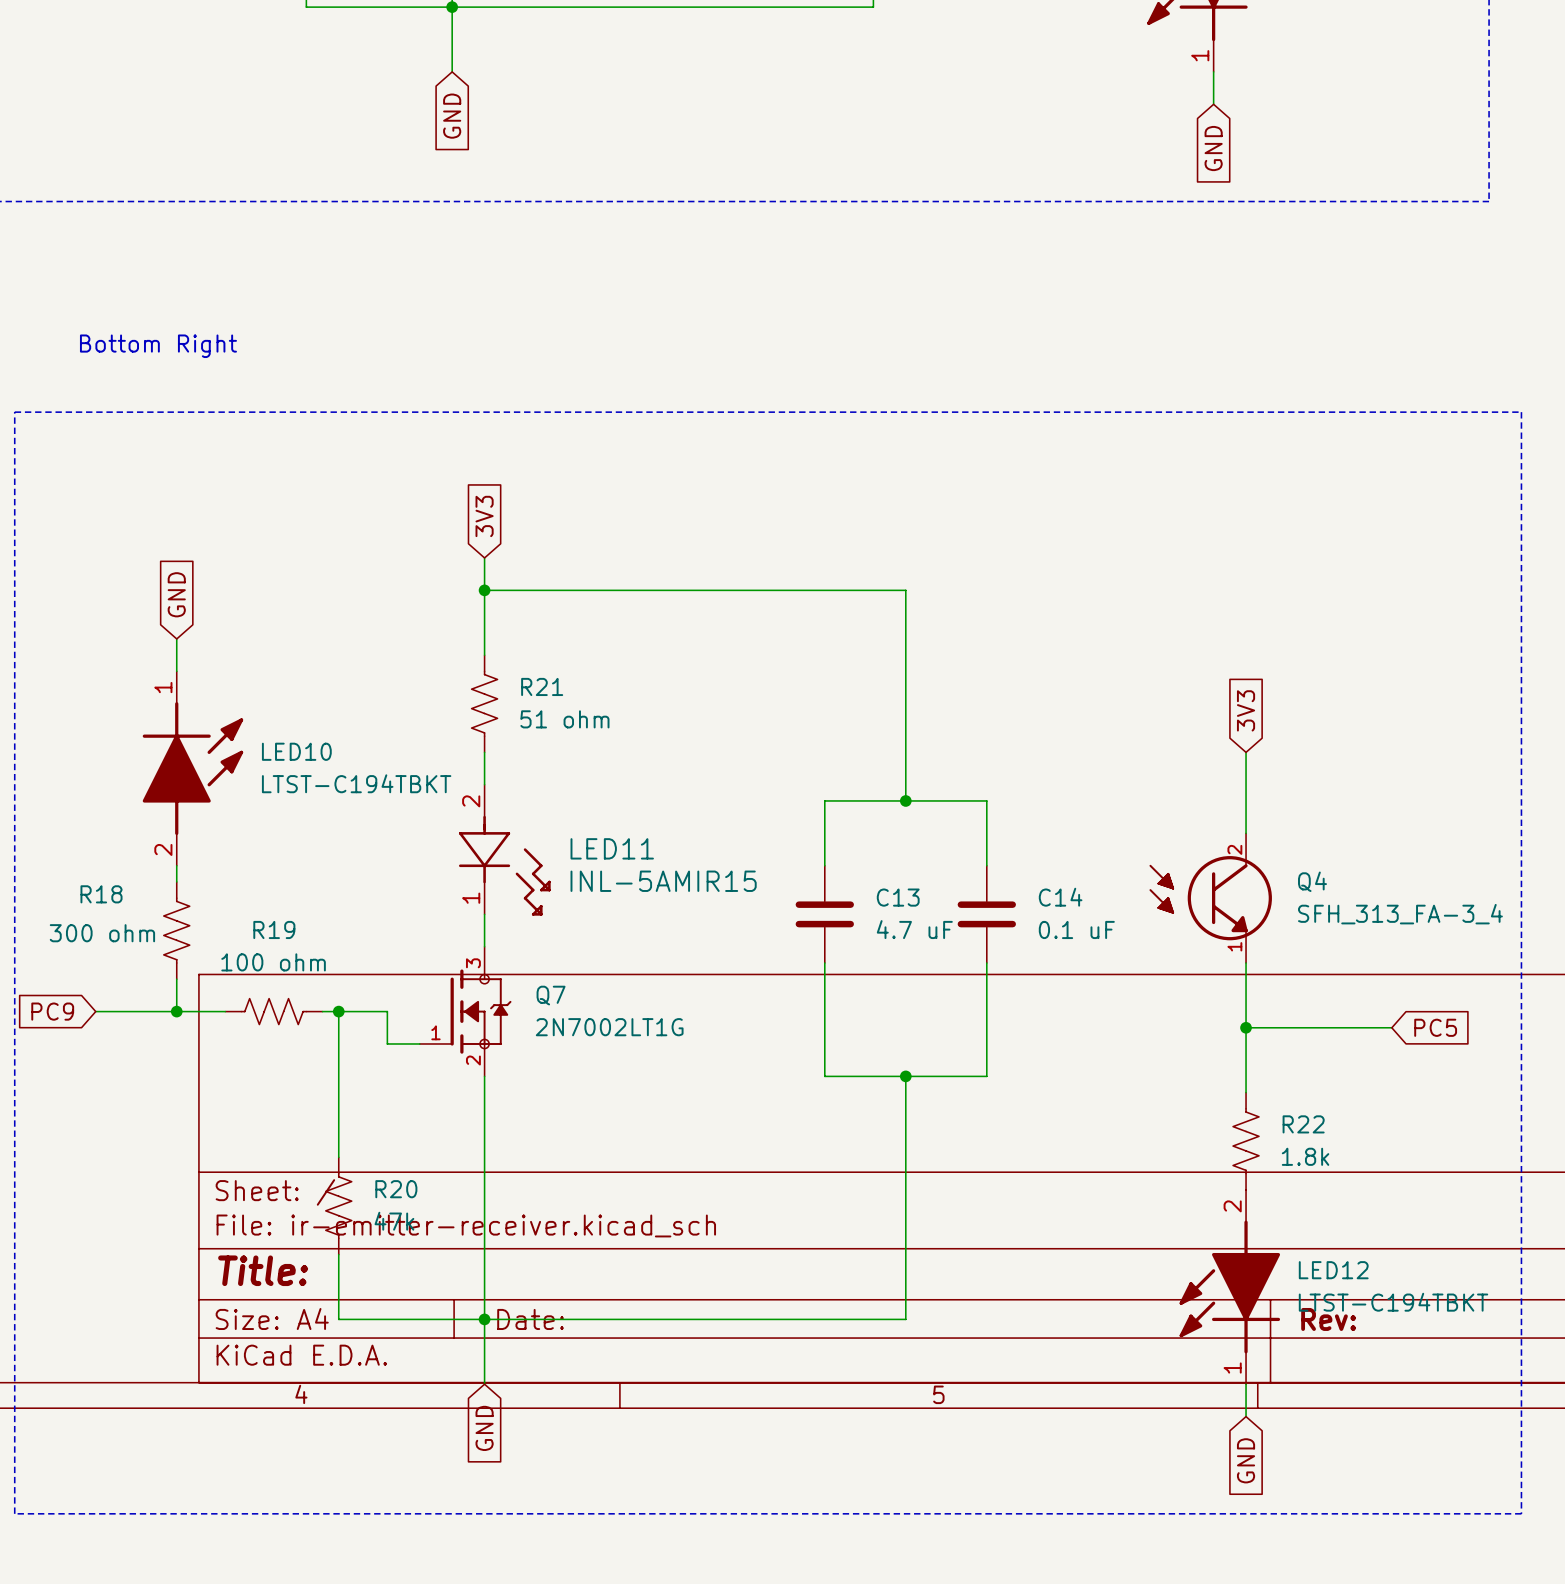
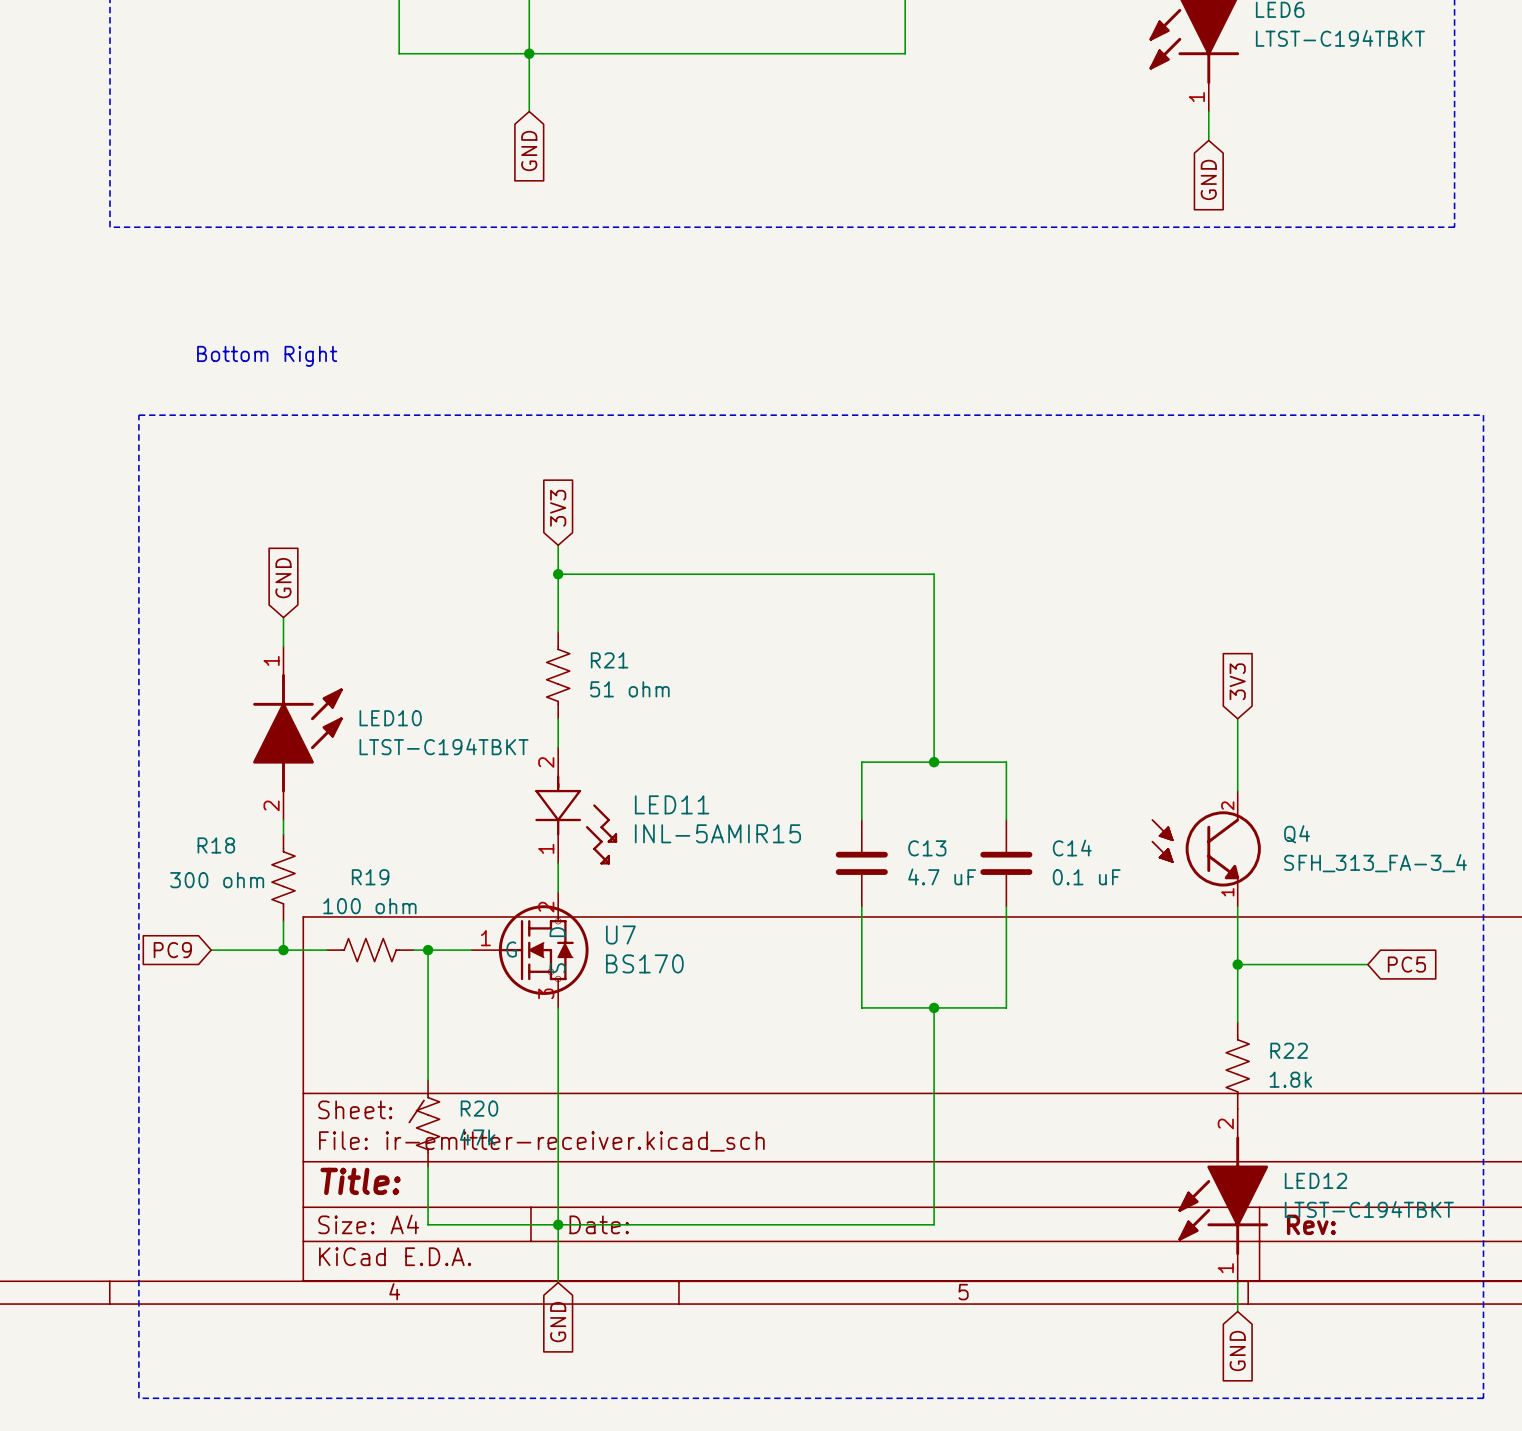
wire: (387, 1011) (387, 1043) (419, 1043) -> none
U7: none -> BS170 (529, 950)
Q7: 2N7002LT1G (465, 1011) -> none

